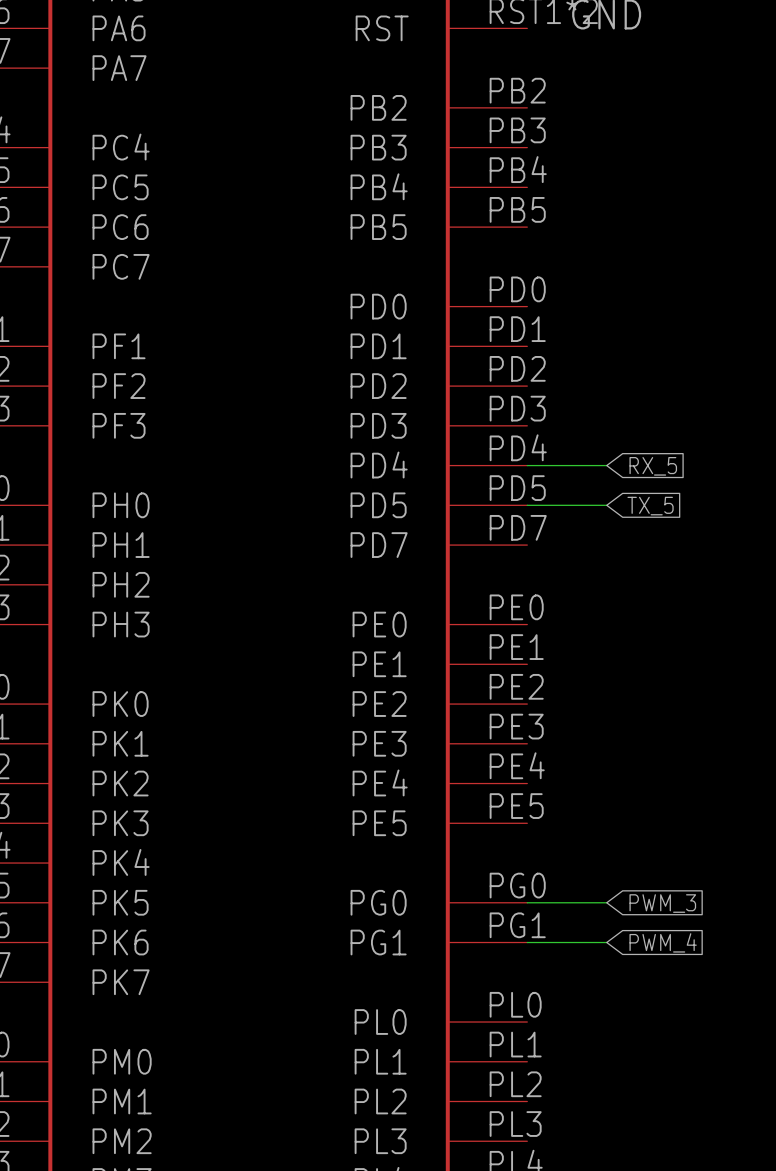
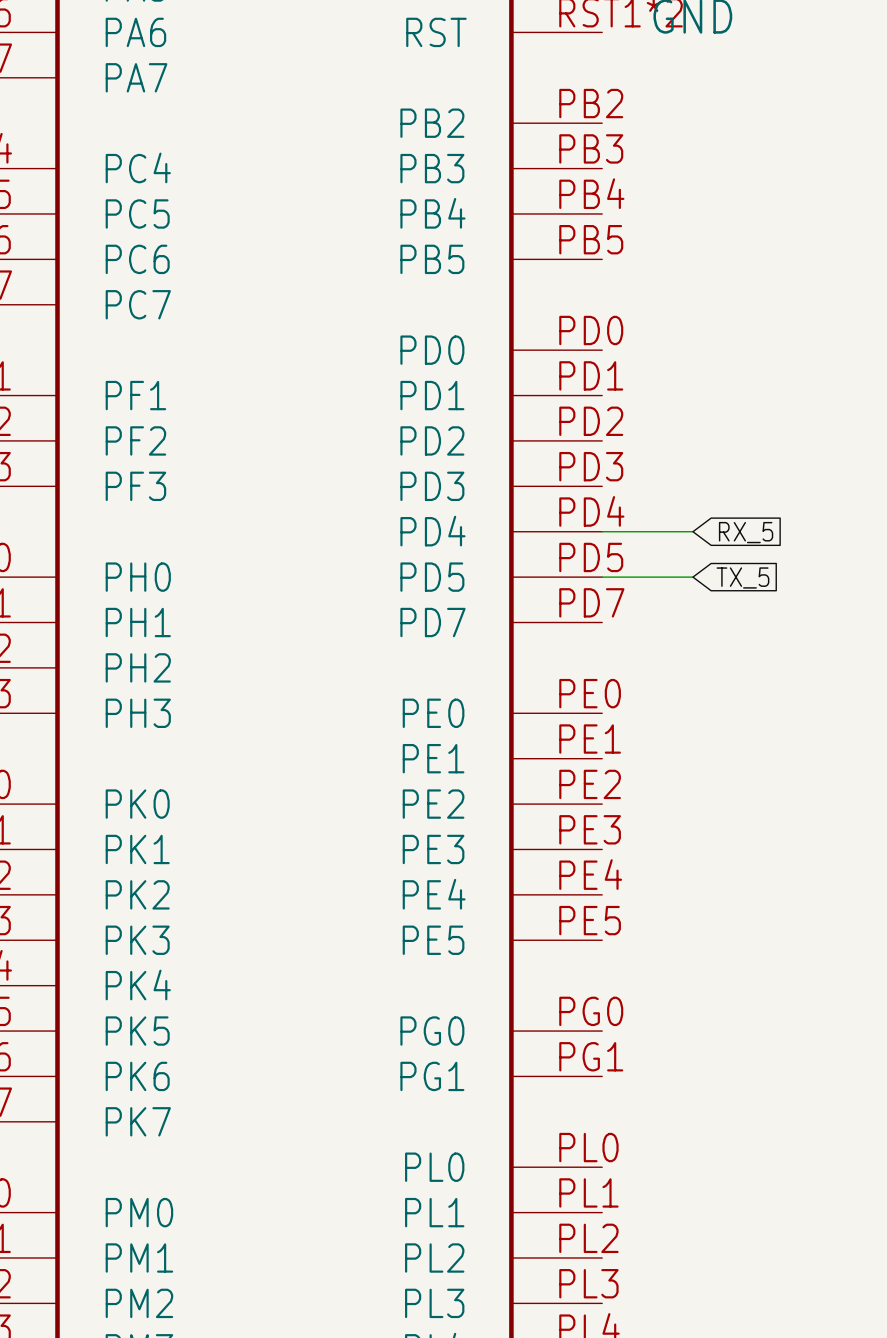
wire: (527, 902) (606, 902) -> none
global label: PWM_3 (662, 903) -> none
wire: (527, 942) (606, 942) -> none
global label: PWM_4 (663, 942) -> none

